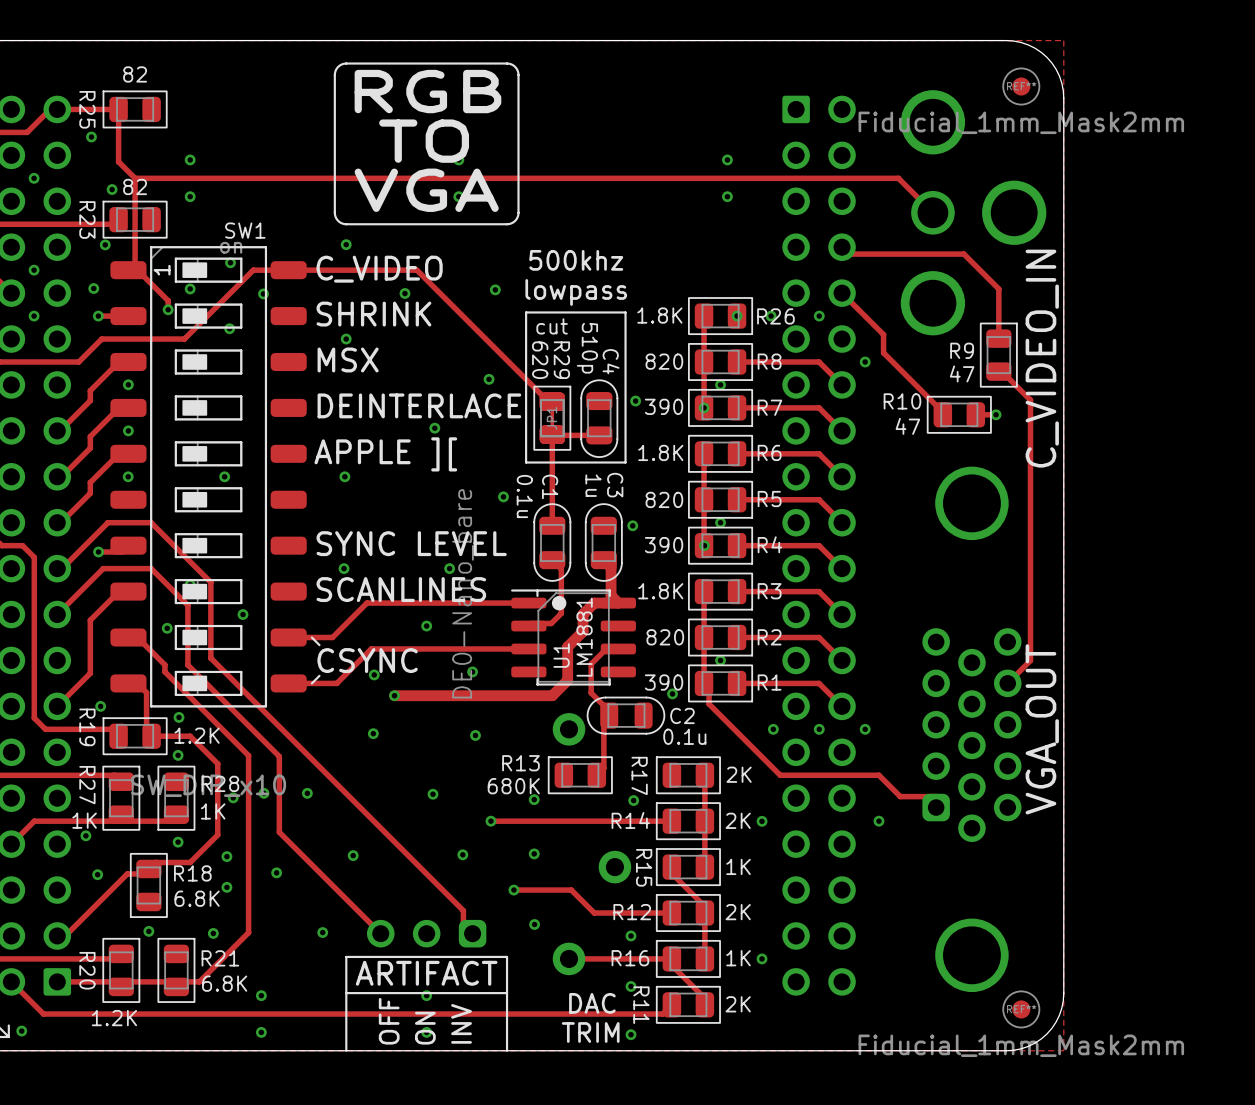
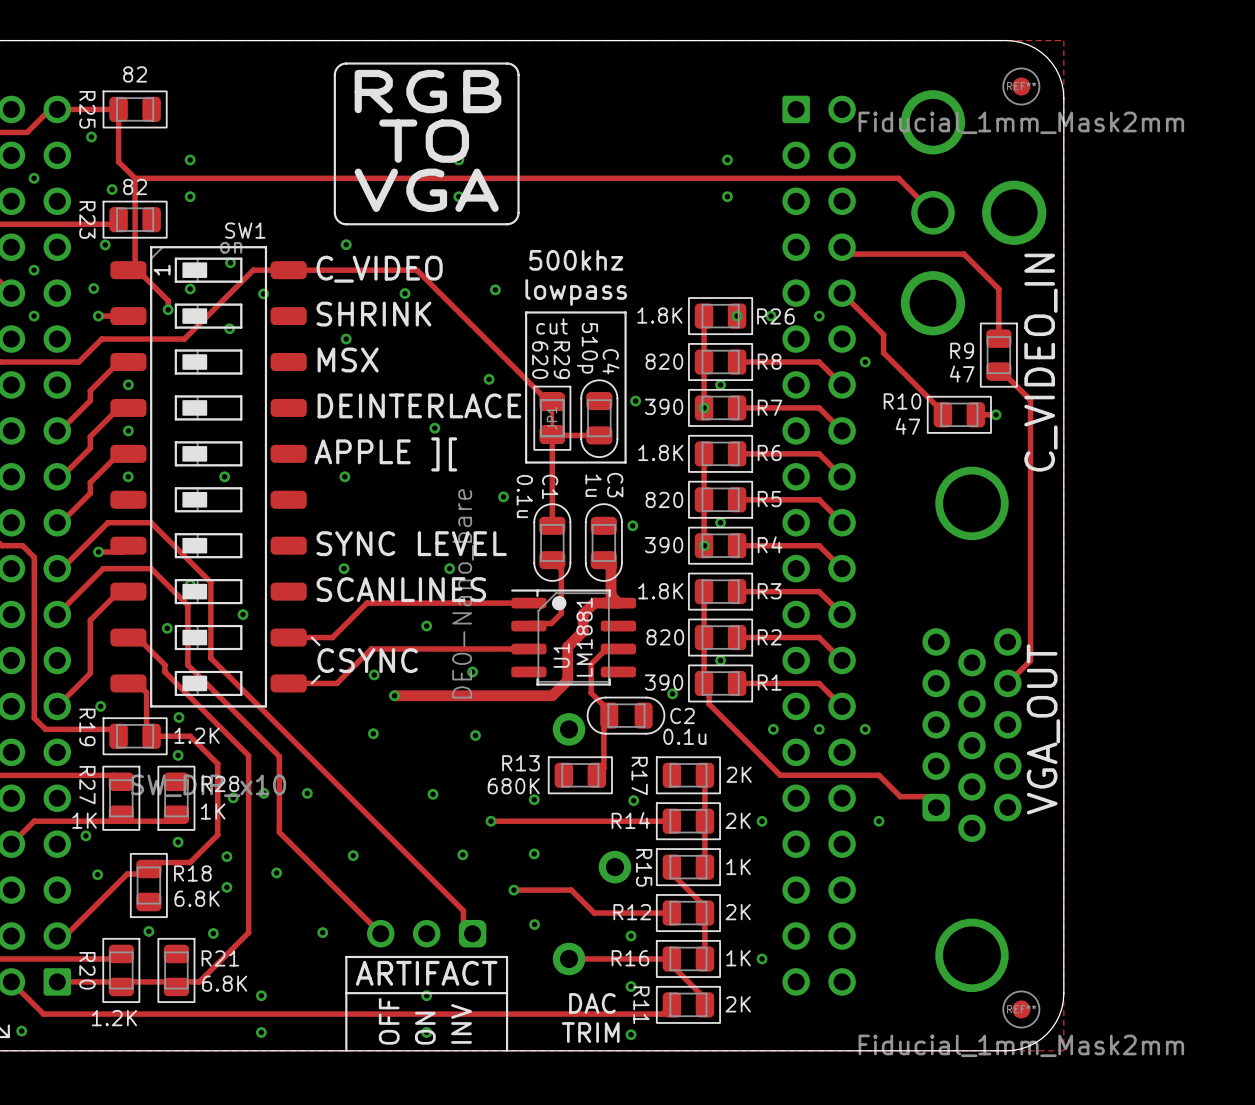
part text: C_VIDEO_IN (1042, 358) -> none
part value: none -> C_VIDEO_IN (1040, 362)
part text: VGA_OUT (1042, 729) -> none
part value: none -> VGA_OUT (1043, 729)

